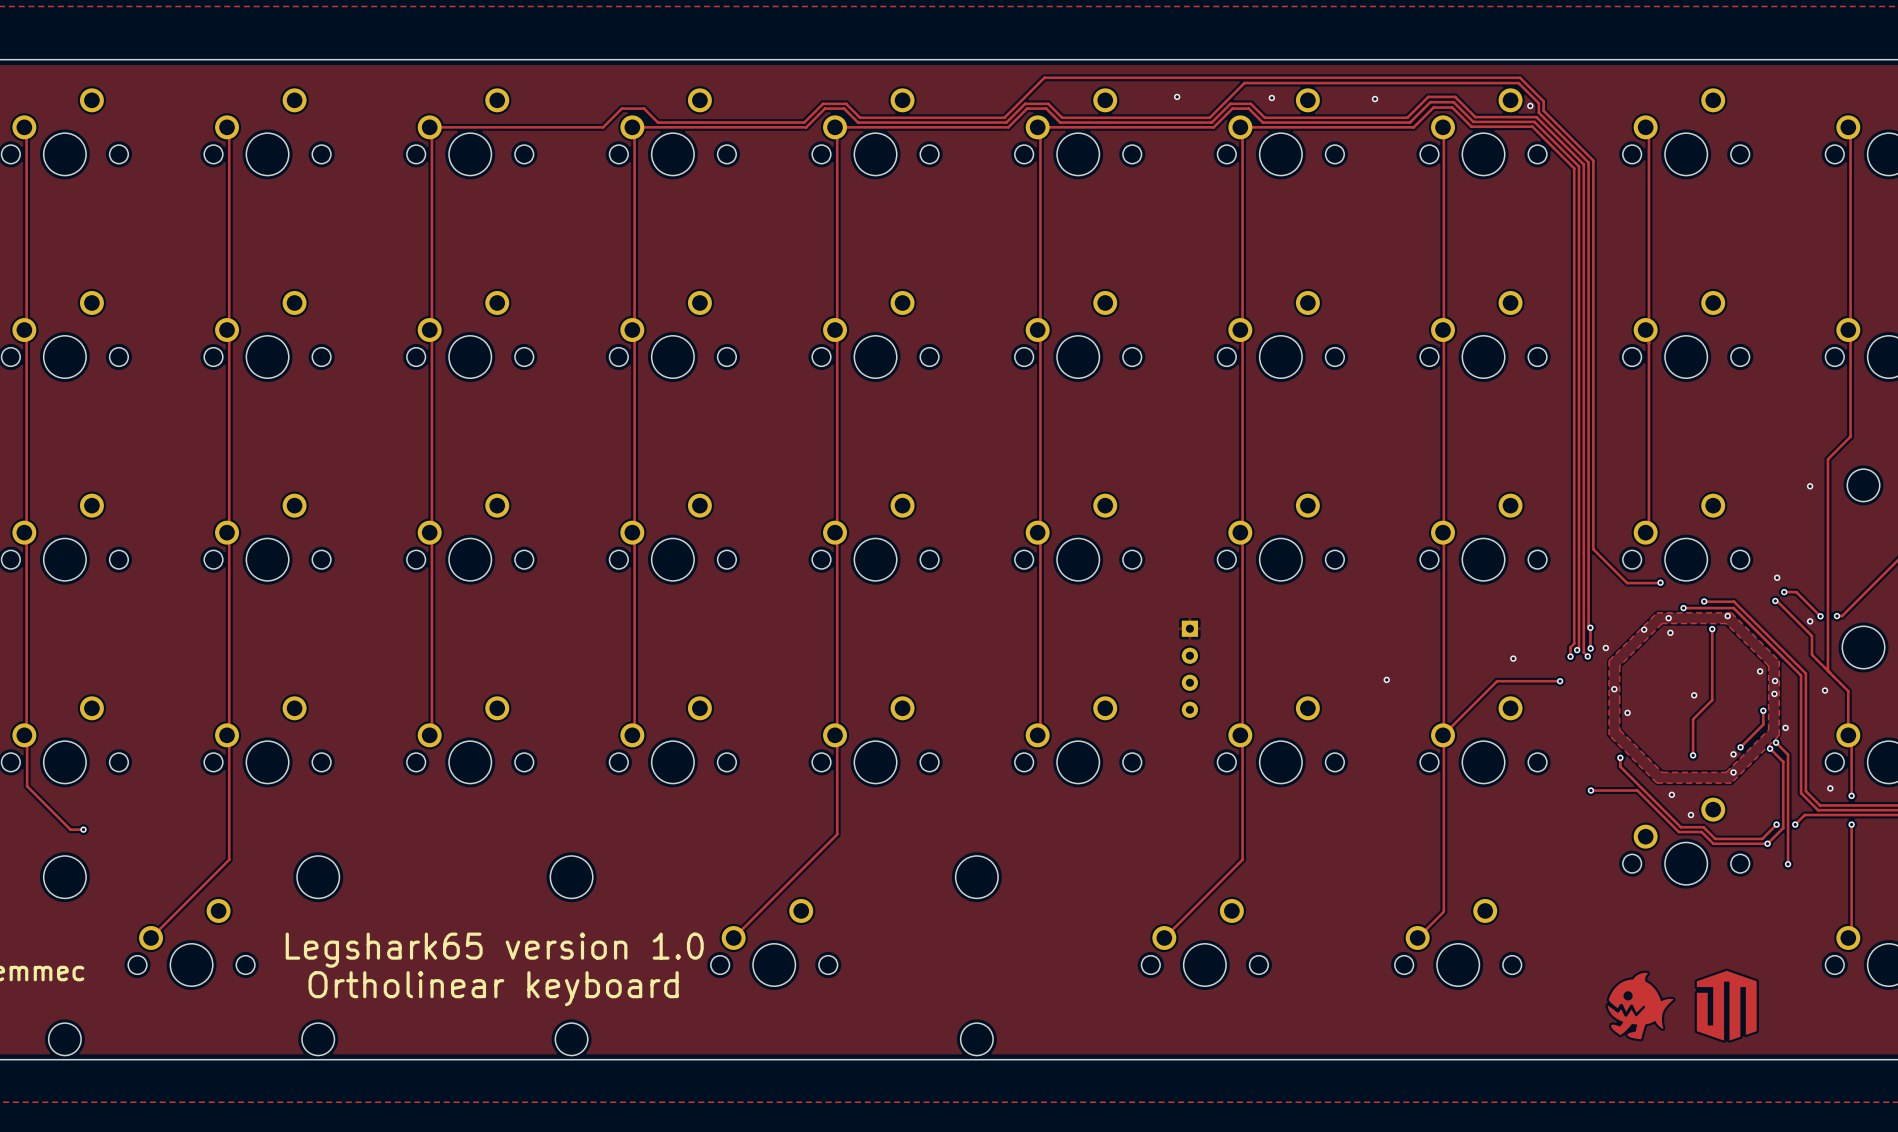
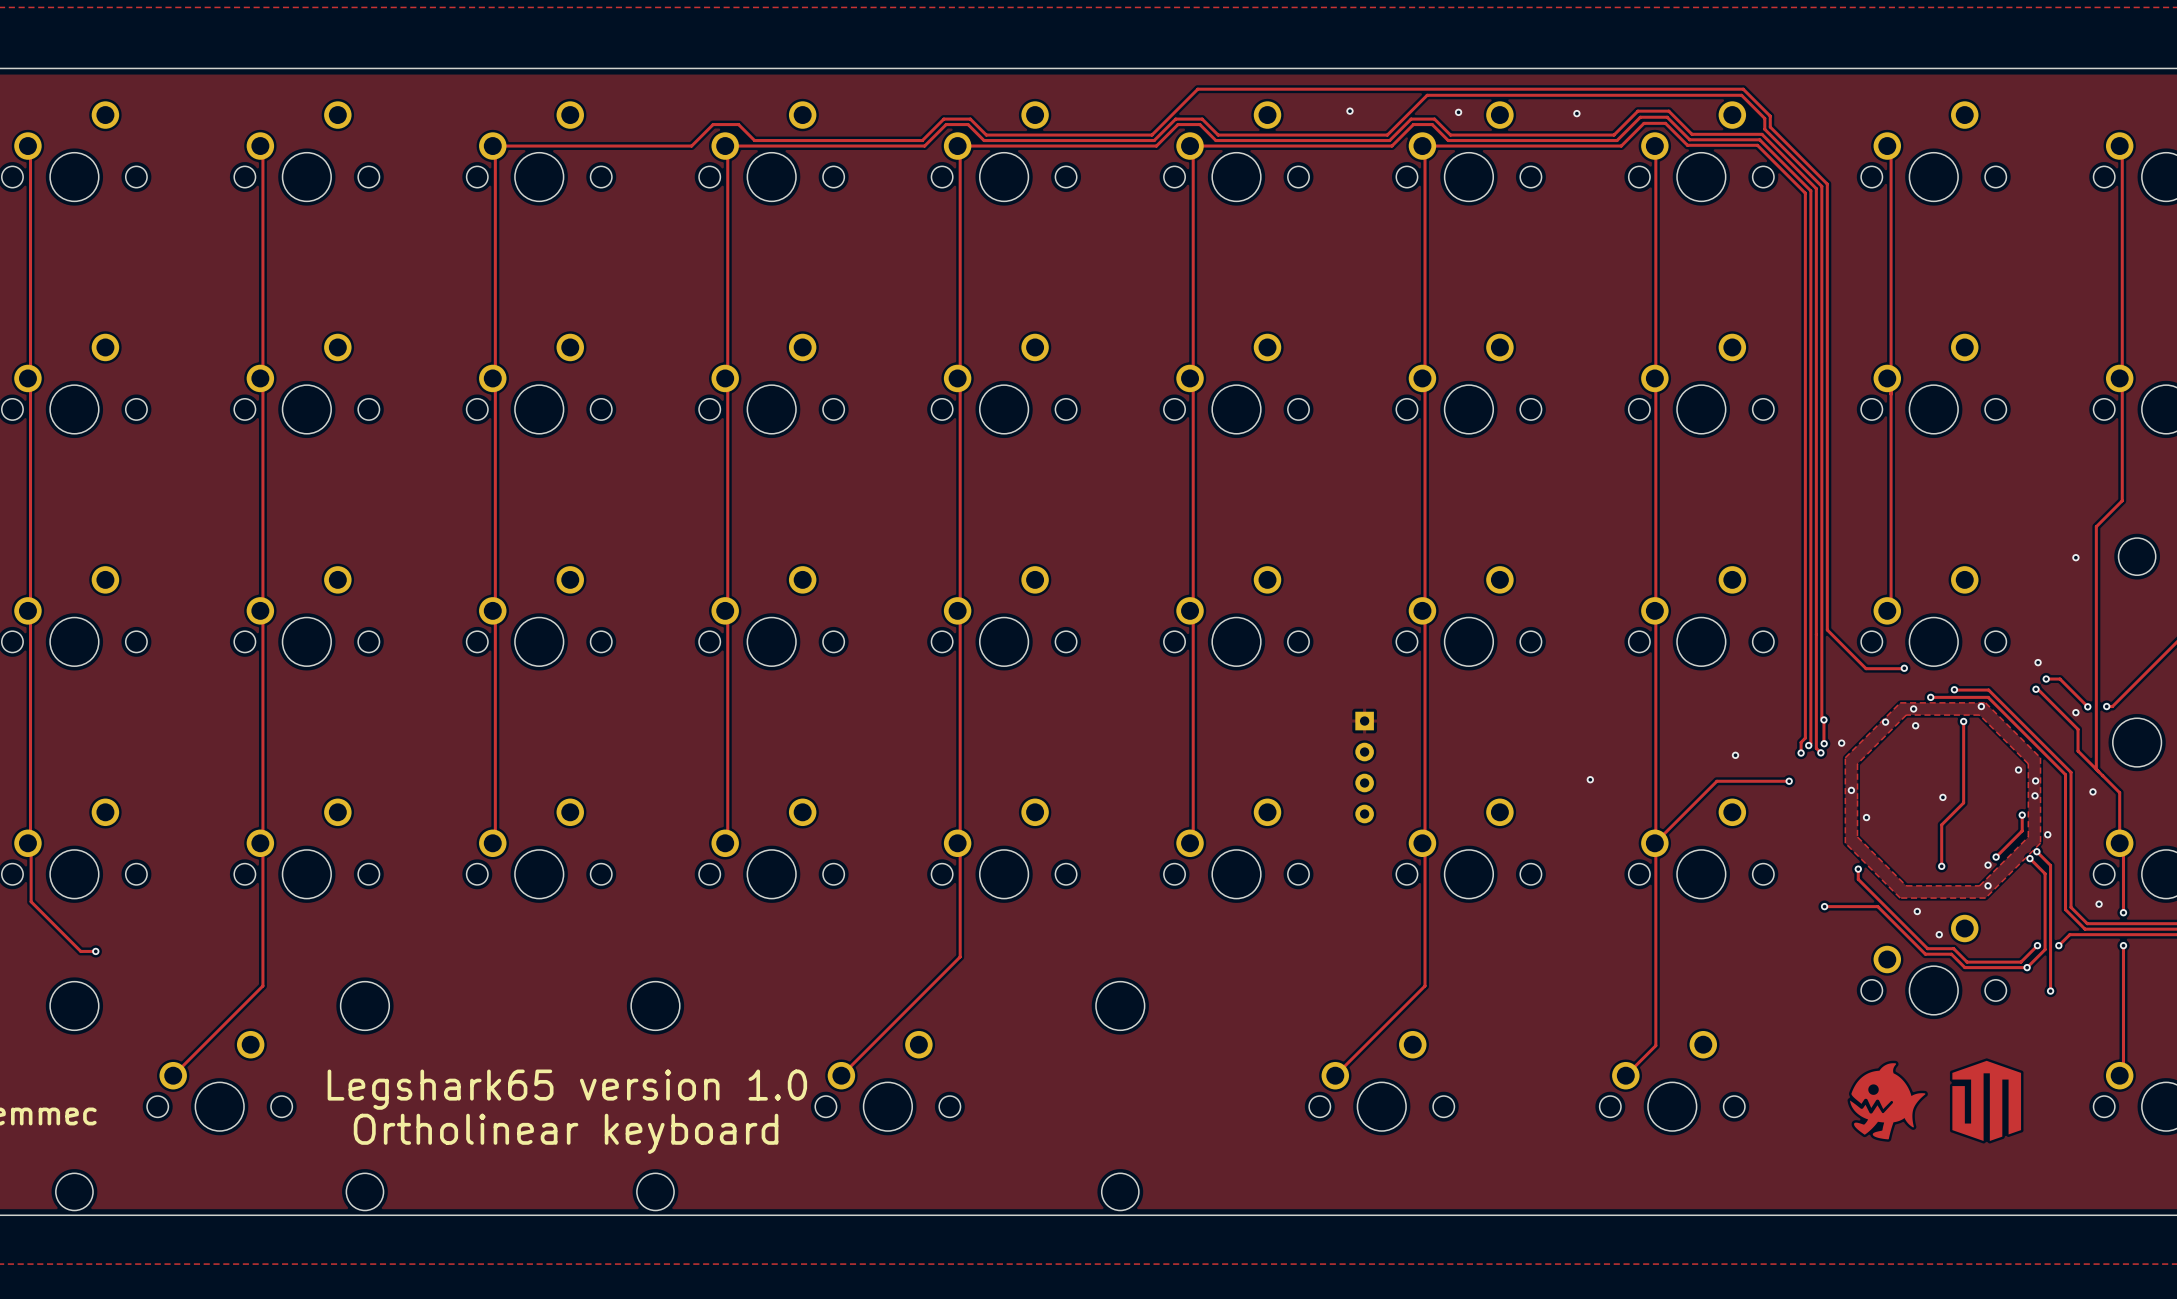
via: (1530, 105) -> none
drawing position: (1726, 1005) -> (1986, 1100)
drawing position: (1640, 1006) -> (1887, 1101)

